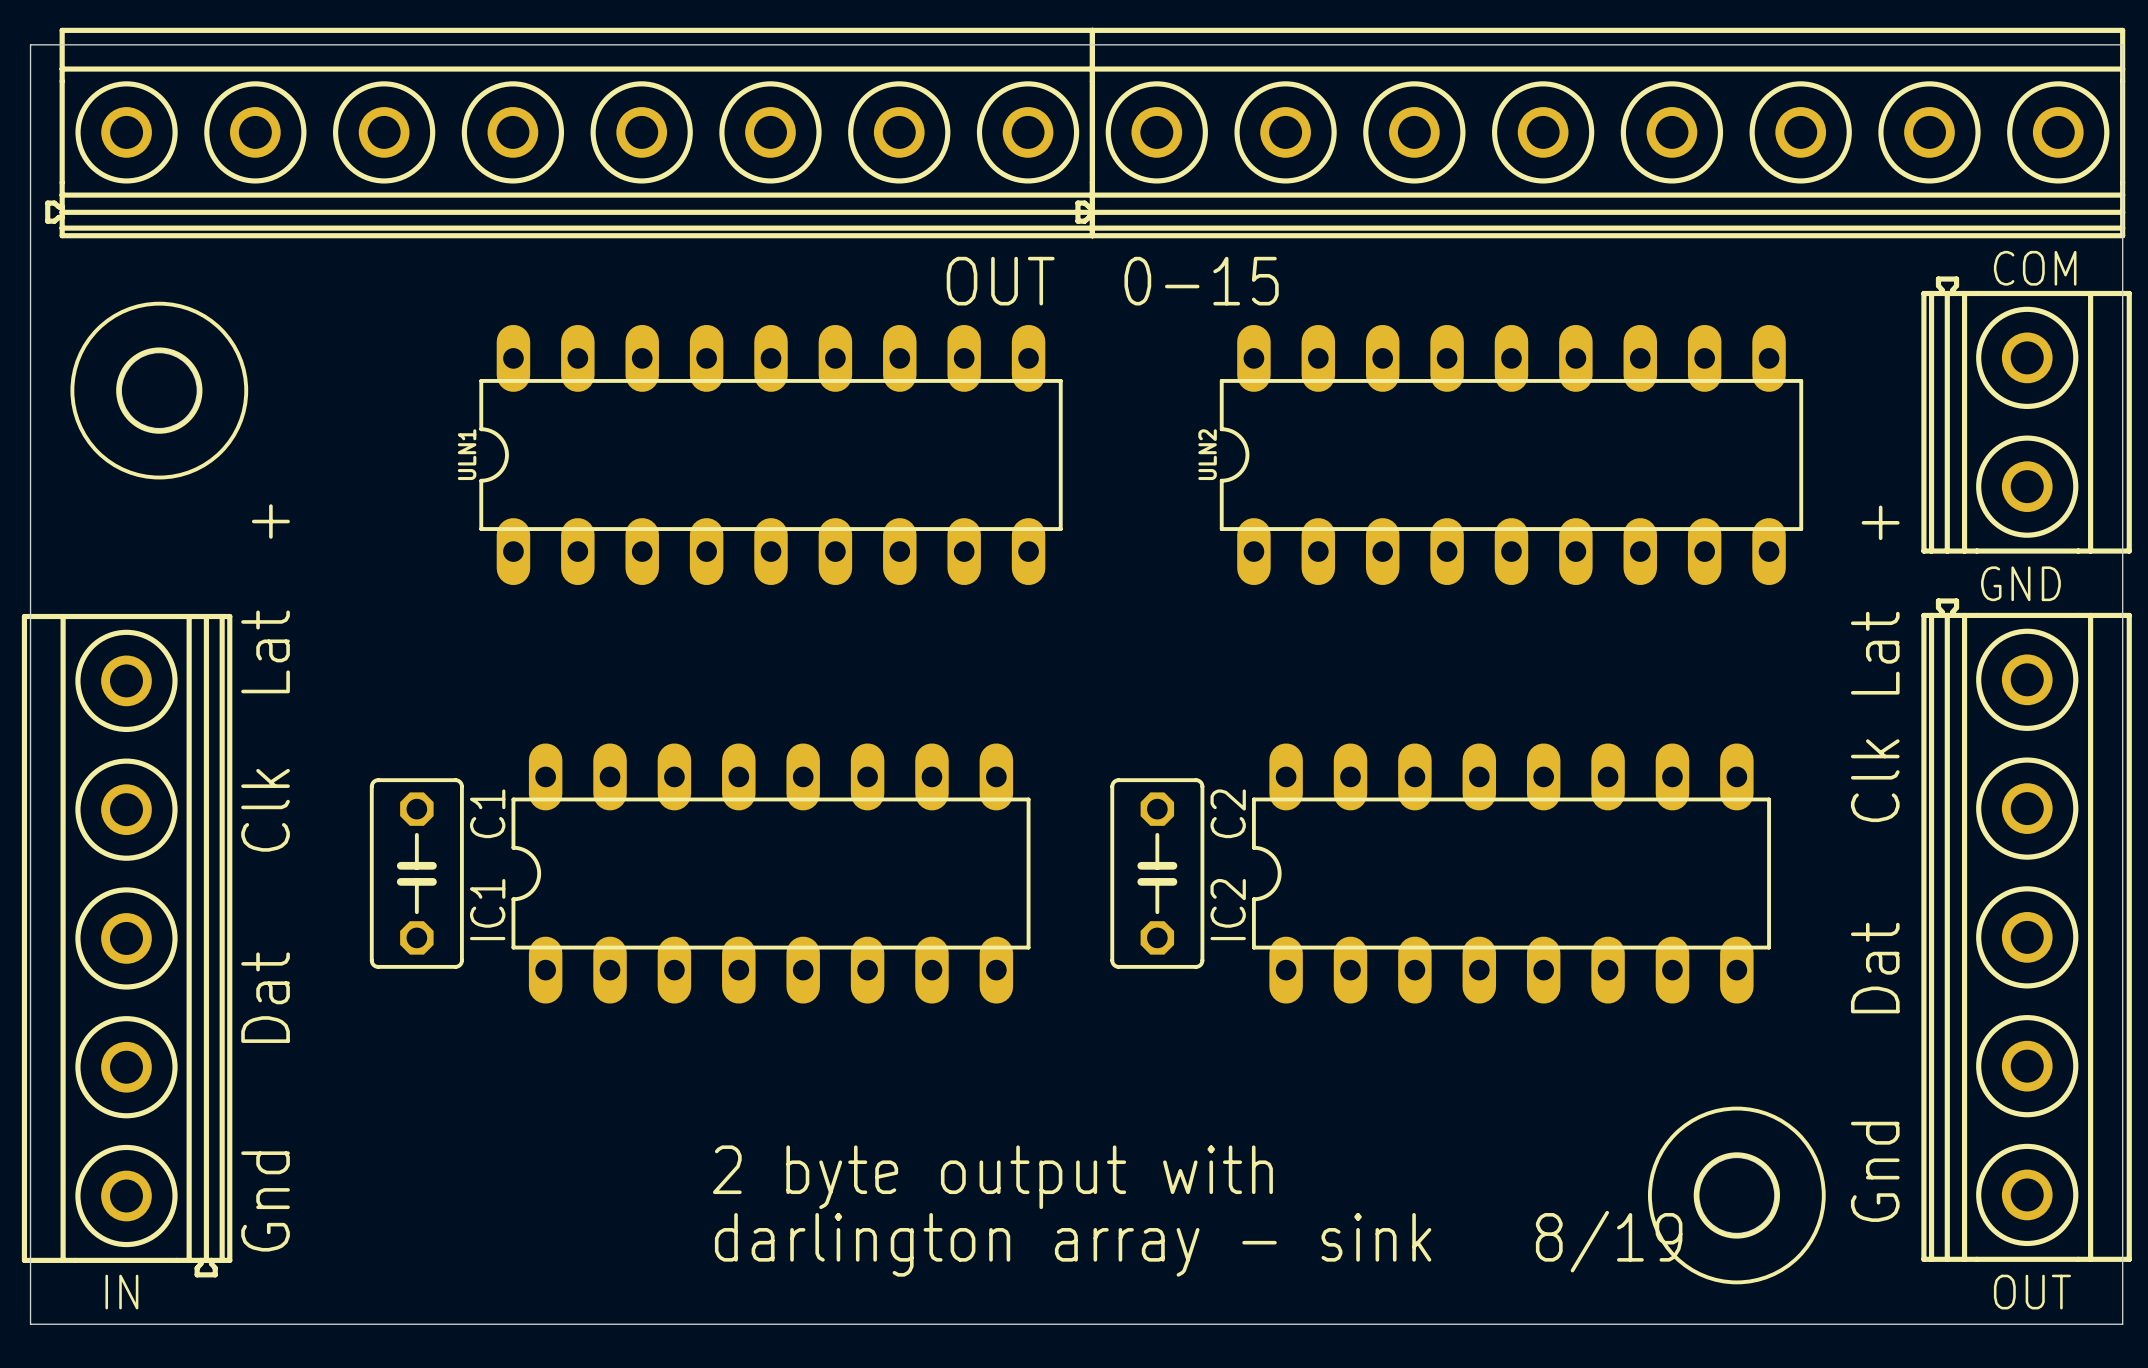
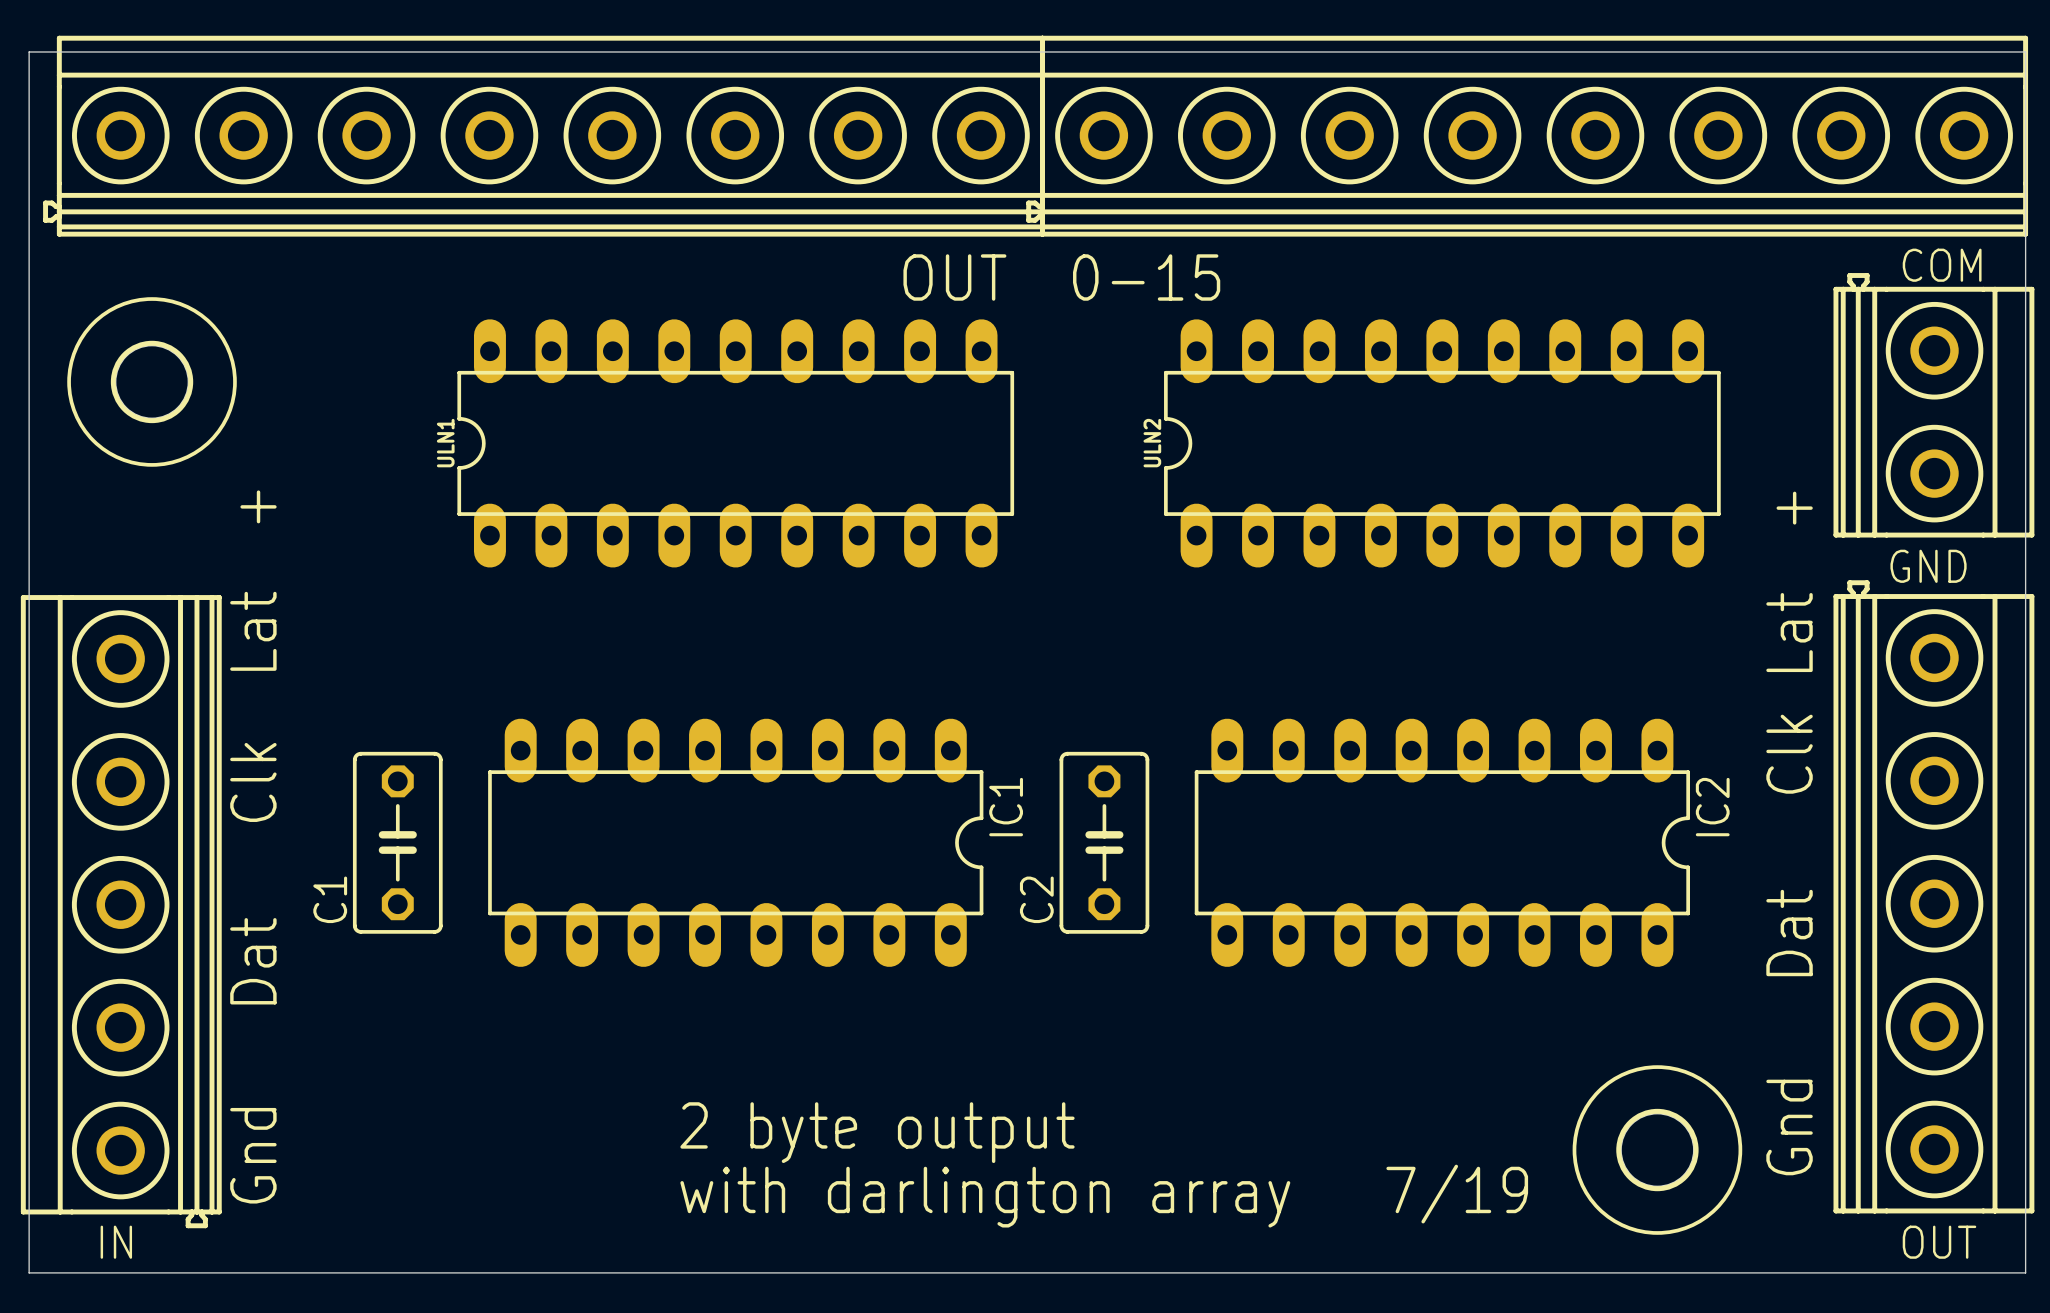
C1 rotation: 0° (416, 873) -> 180° (397, 842)
IC1 rotation: 0° (771, 873) -> 180° (735, 842)
C2 rotation: 0° (1157, 873) -> 180° (1104, 842)
IC2 rotation: 0° (1511, 873) -> 180° (1442, 842)
text: 2 byte output with (992, 1177) -> 2 byte output (877, 1132)
text: darlington array - sink 8/19 (1198, 1243) -> with darlington array 7/19 (1104, 1196)

